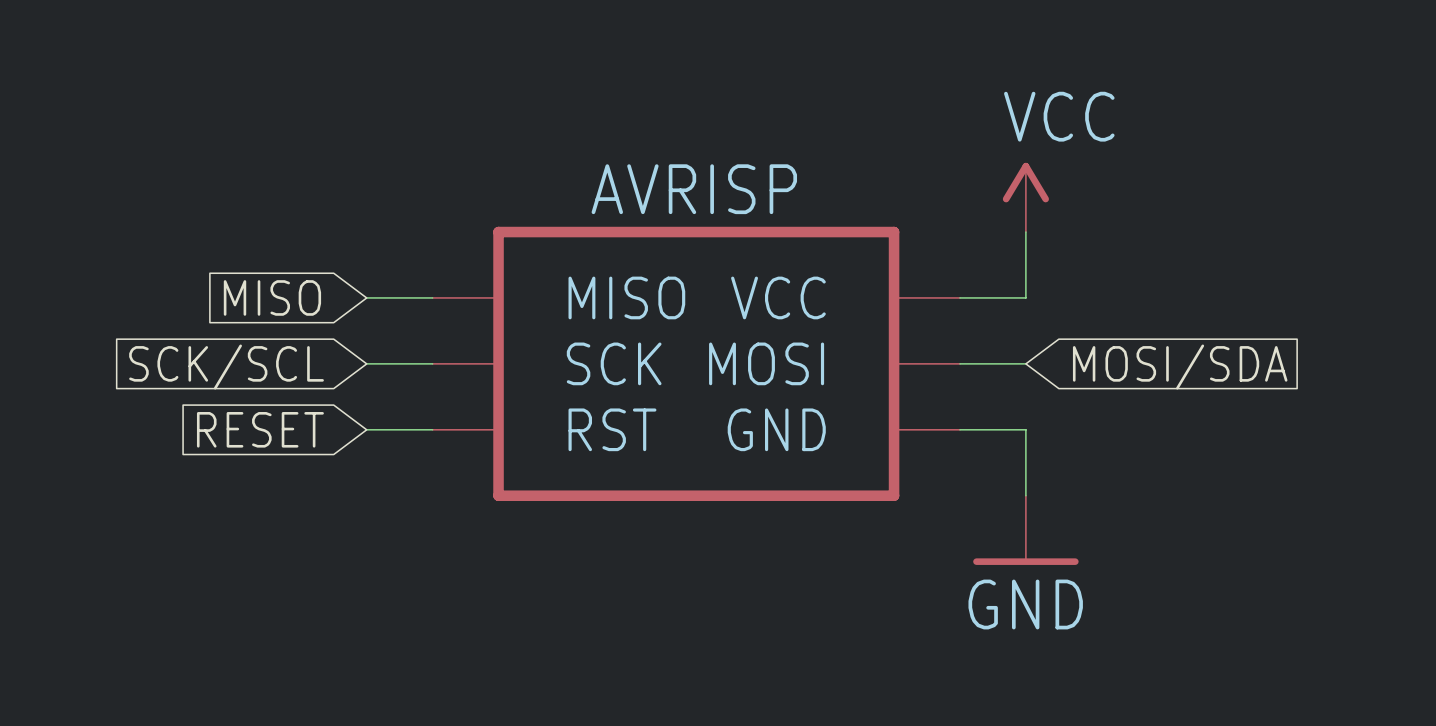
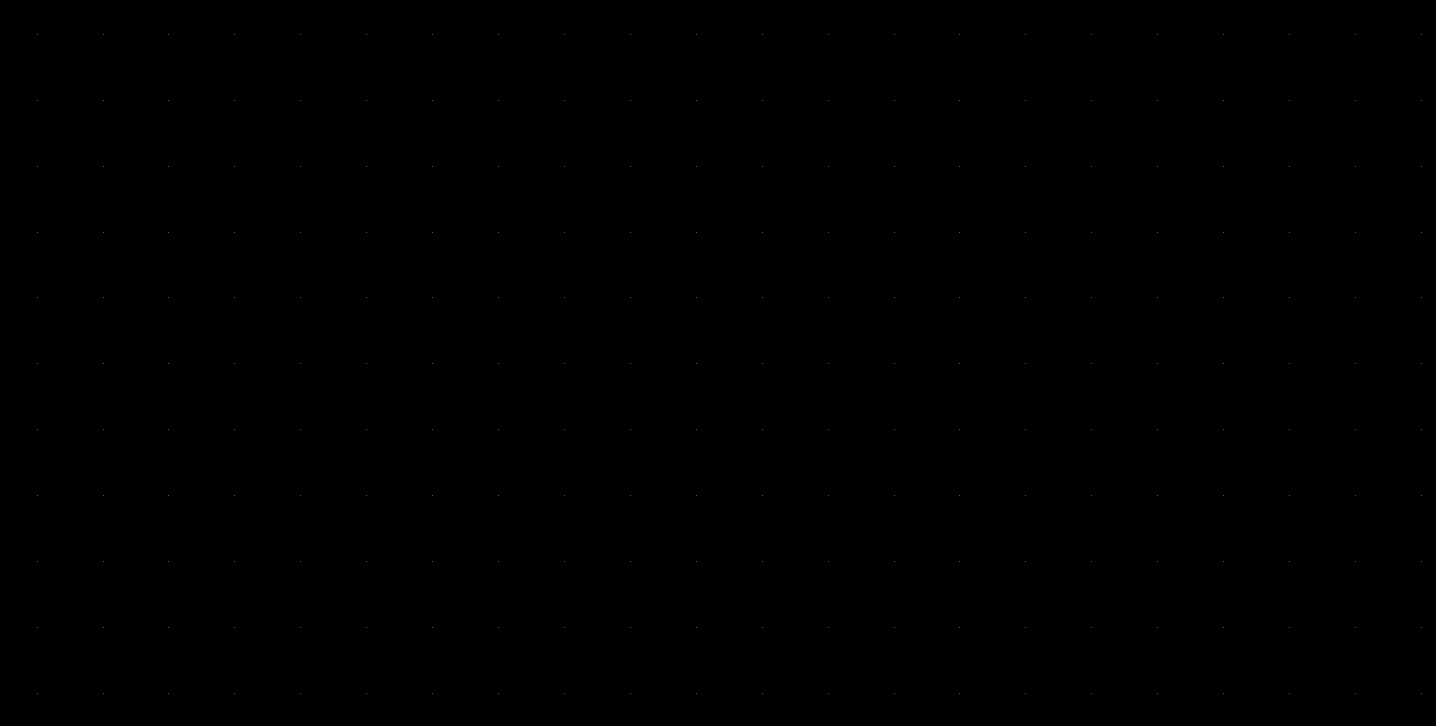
power symbol: VCC (1025, 197) -> none
wire: (1025, 232) (1025, 297) (959, 297) -> none
global label: MISO (272, 297) -> none
wire: (366, 297) (432, 297) -> none
wire: (366, 363) (432, 363) -> none
AVRISP: (696, 363) -> none
wire: (959, 363) (1025, 363) -> none
global label: SCK/SCL (226, 367) -> none
global label: MOSI/SDA (1180, 367) -> none
global label: RESET (260, 429) -> none
wire: (366, 429) (432, 429) -> none
wire: (959, 429) (1025, 429) (1025, 495) -> none
power symbol: GND (1025, 530) -> none

